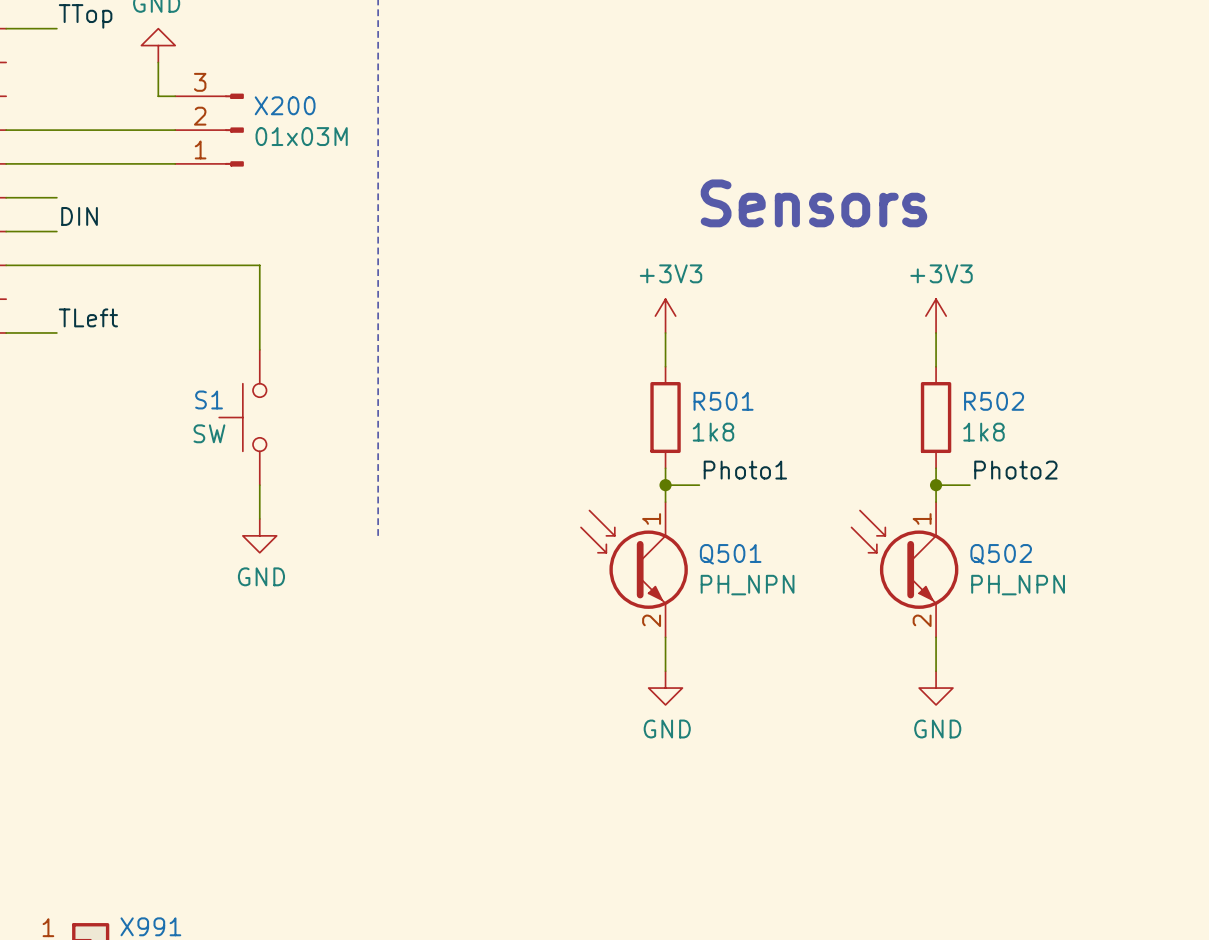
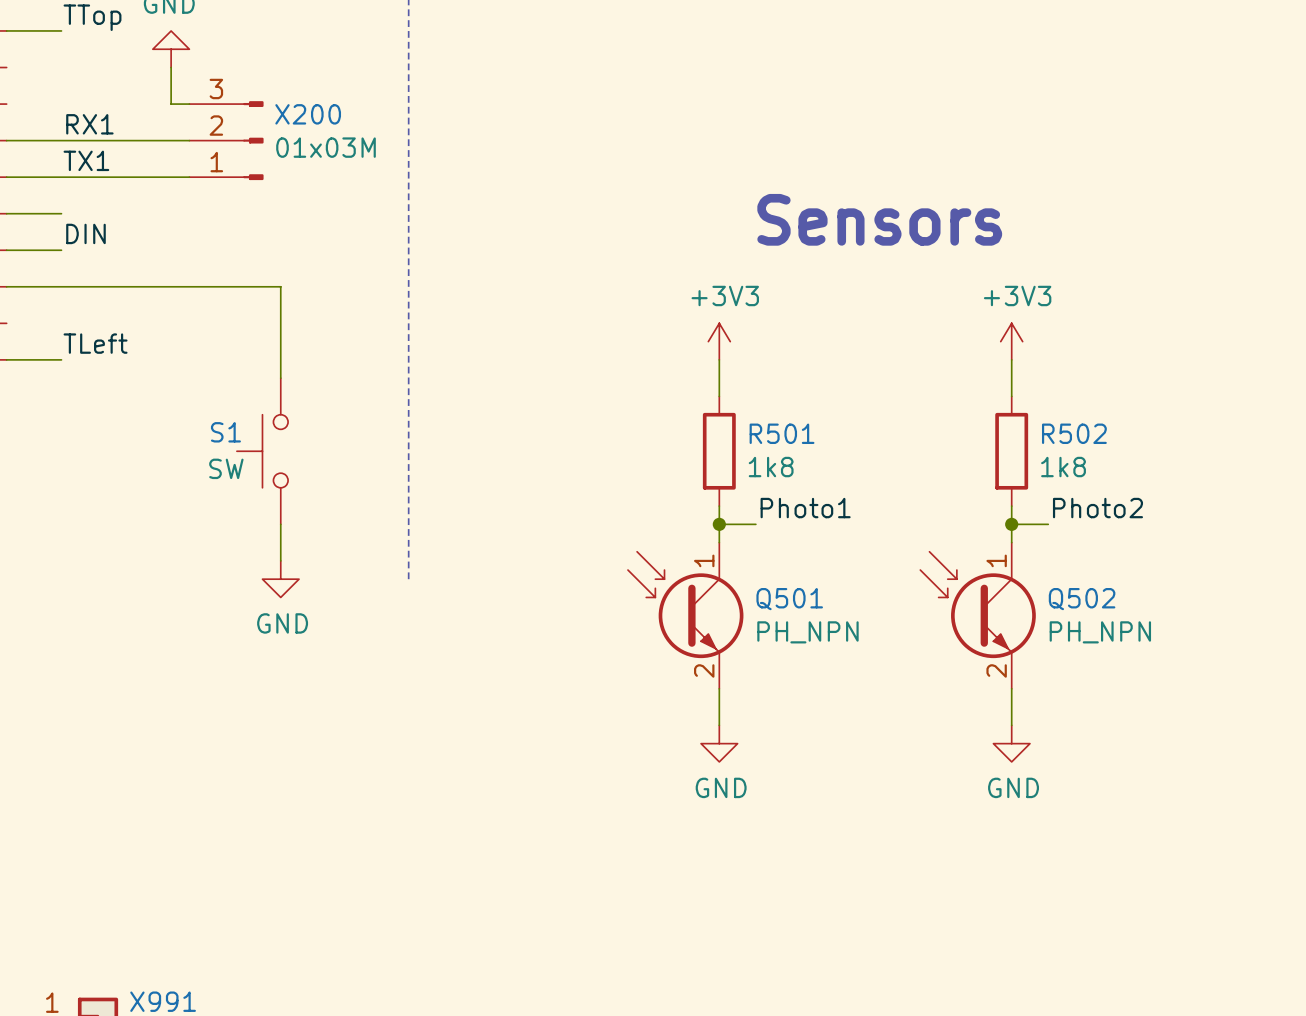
label: none -> RX1 (89, 124)
label: none -> TX1 (86, 160)

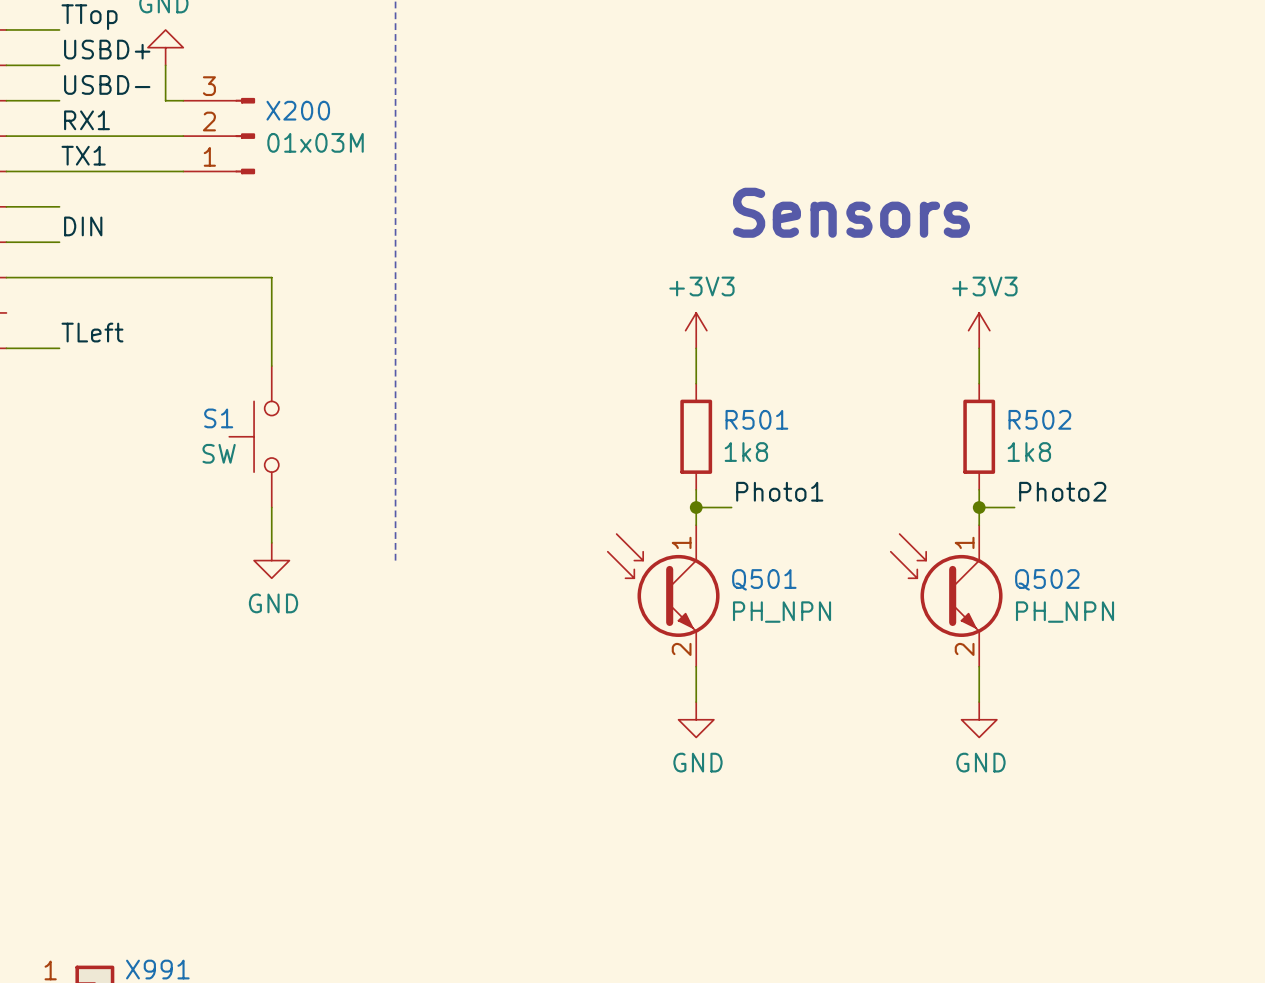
label: none -> USBD+ (107, 49)
wire: none -> (6, 65) (59, 65)
label: none -> USBD- (107, 84)
wire: none -> (6, 100) (59, 100)

